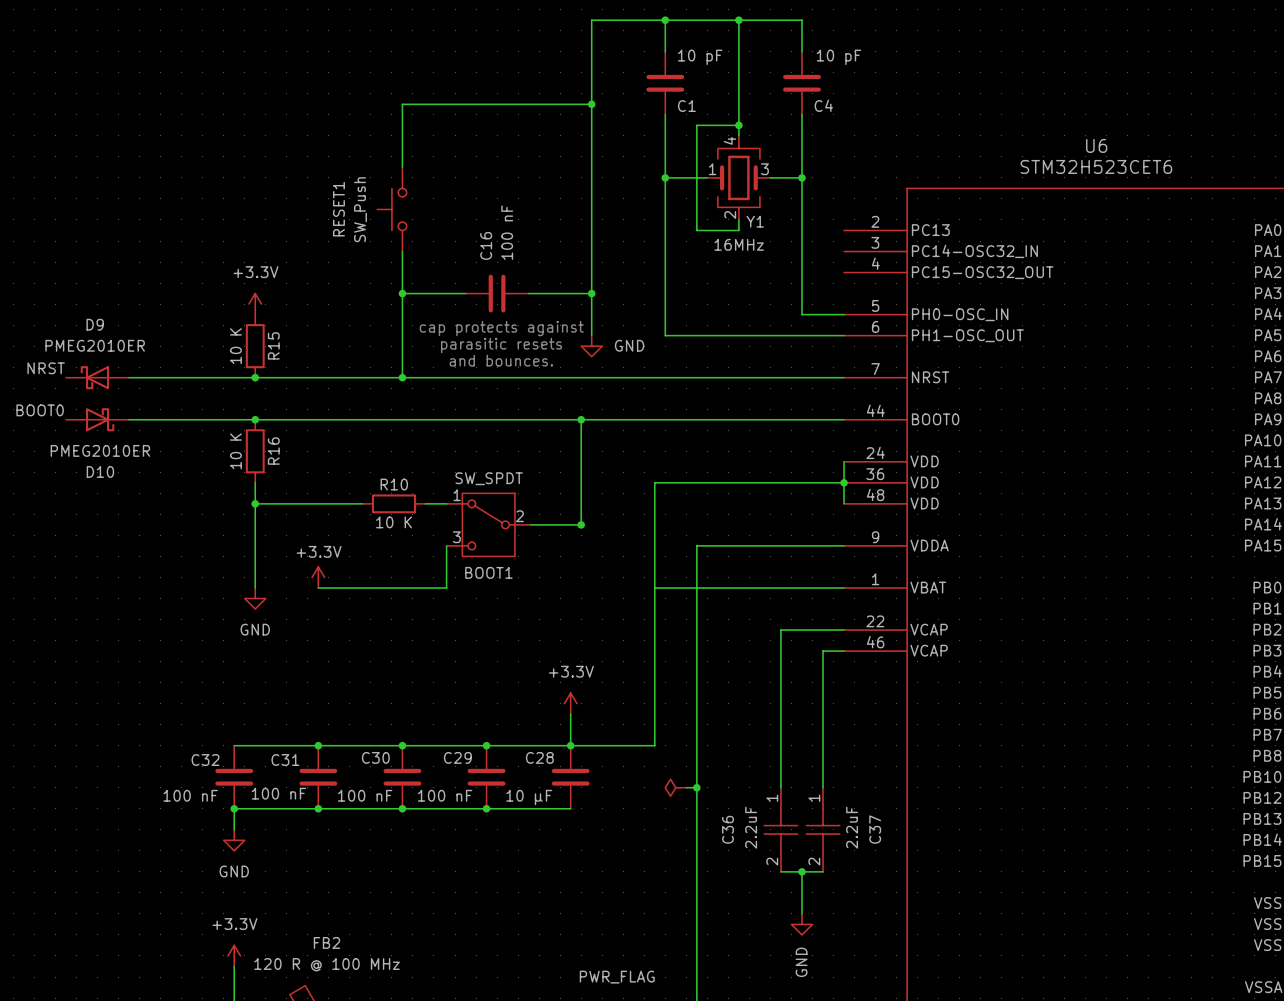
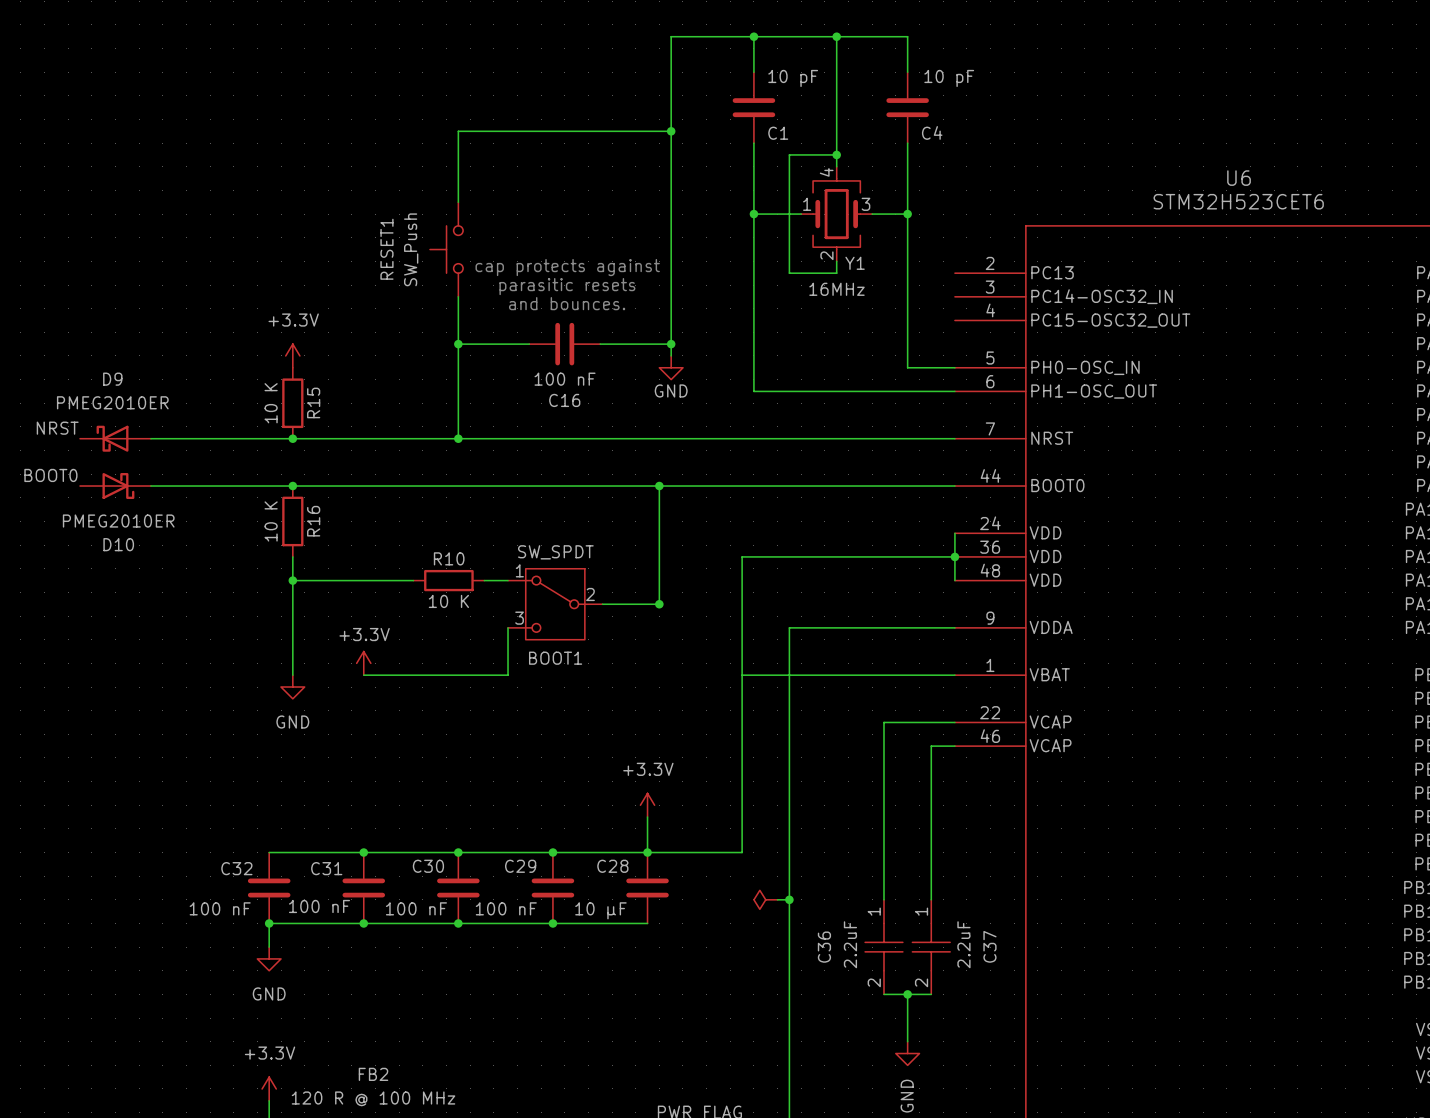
C16 value rotation: 0° (507, 232) -> 90° clockwise (565, 379)
C16 value position: 100 nF (507, 232) -> 100 nF (565, 379)
C16 name rotation: 0° (486, 245) -> 90° clockwise (564, 400)
C16 name position: C16 (486, 245) -> C16 (564, 400)
text position: cap protects against (501, 328) -> cap protects against (567, 267)
text position: parasitic resets (501, 345) -> parasitic resets (567, 286)
power symbol text position: GND (629, 345) -> GND (671, 390)
power symbol position: GND (591, 346) -> GND (671, 367)
text position: and bounces. (501, 360) -> and bounces. (567, 303)

